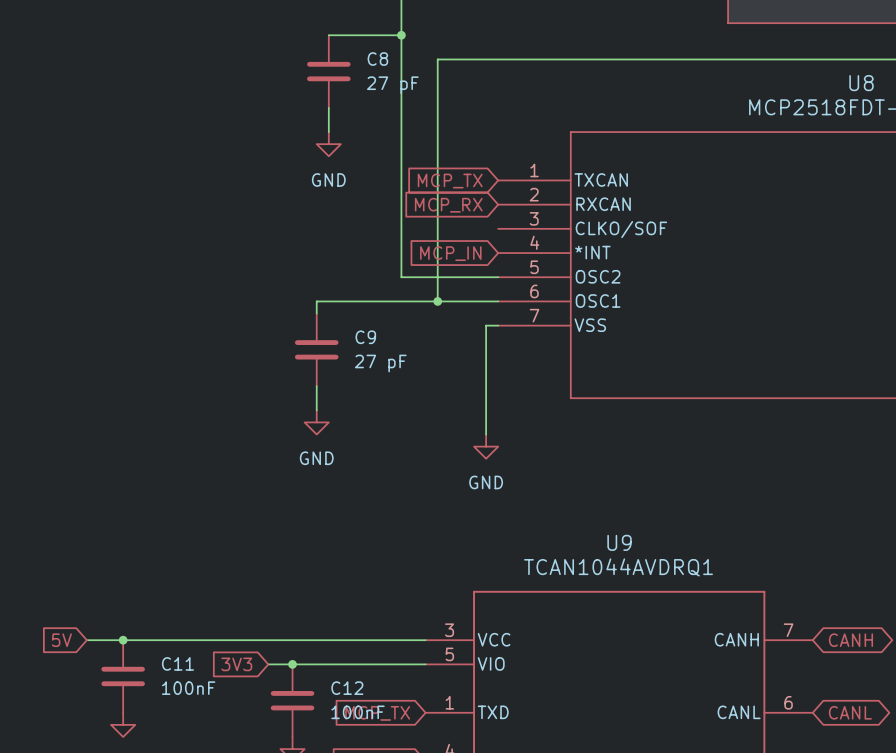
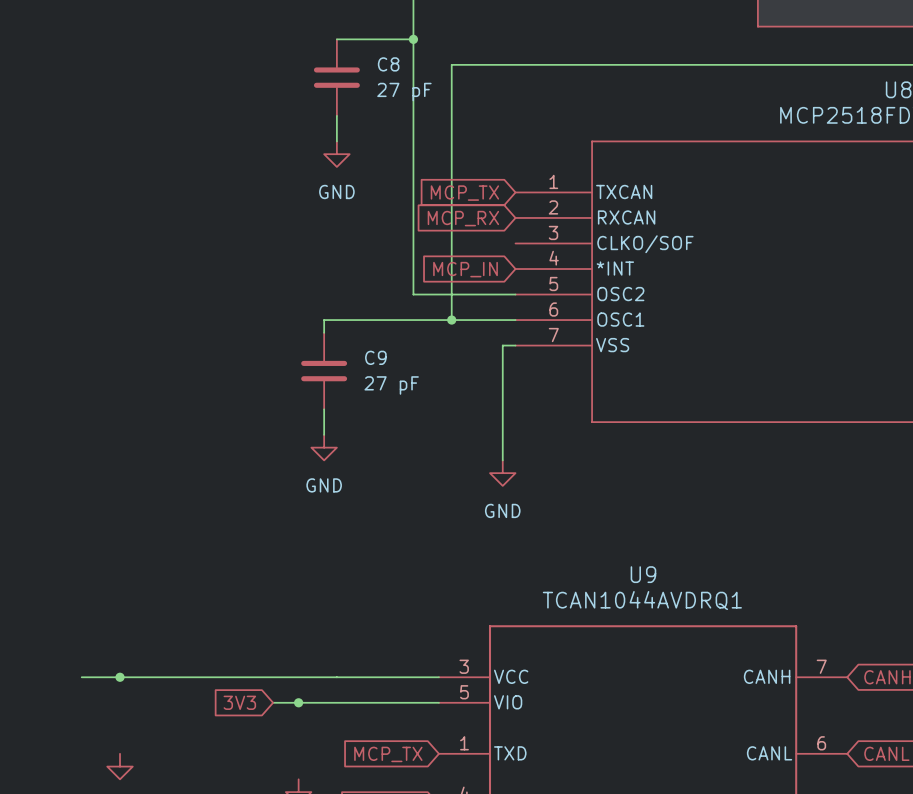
global label: 5V (61, 640) -> none
C11: 100nF (123, 676) -> none
C12: 100nF (292, 700) -> none

